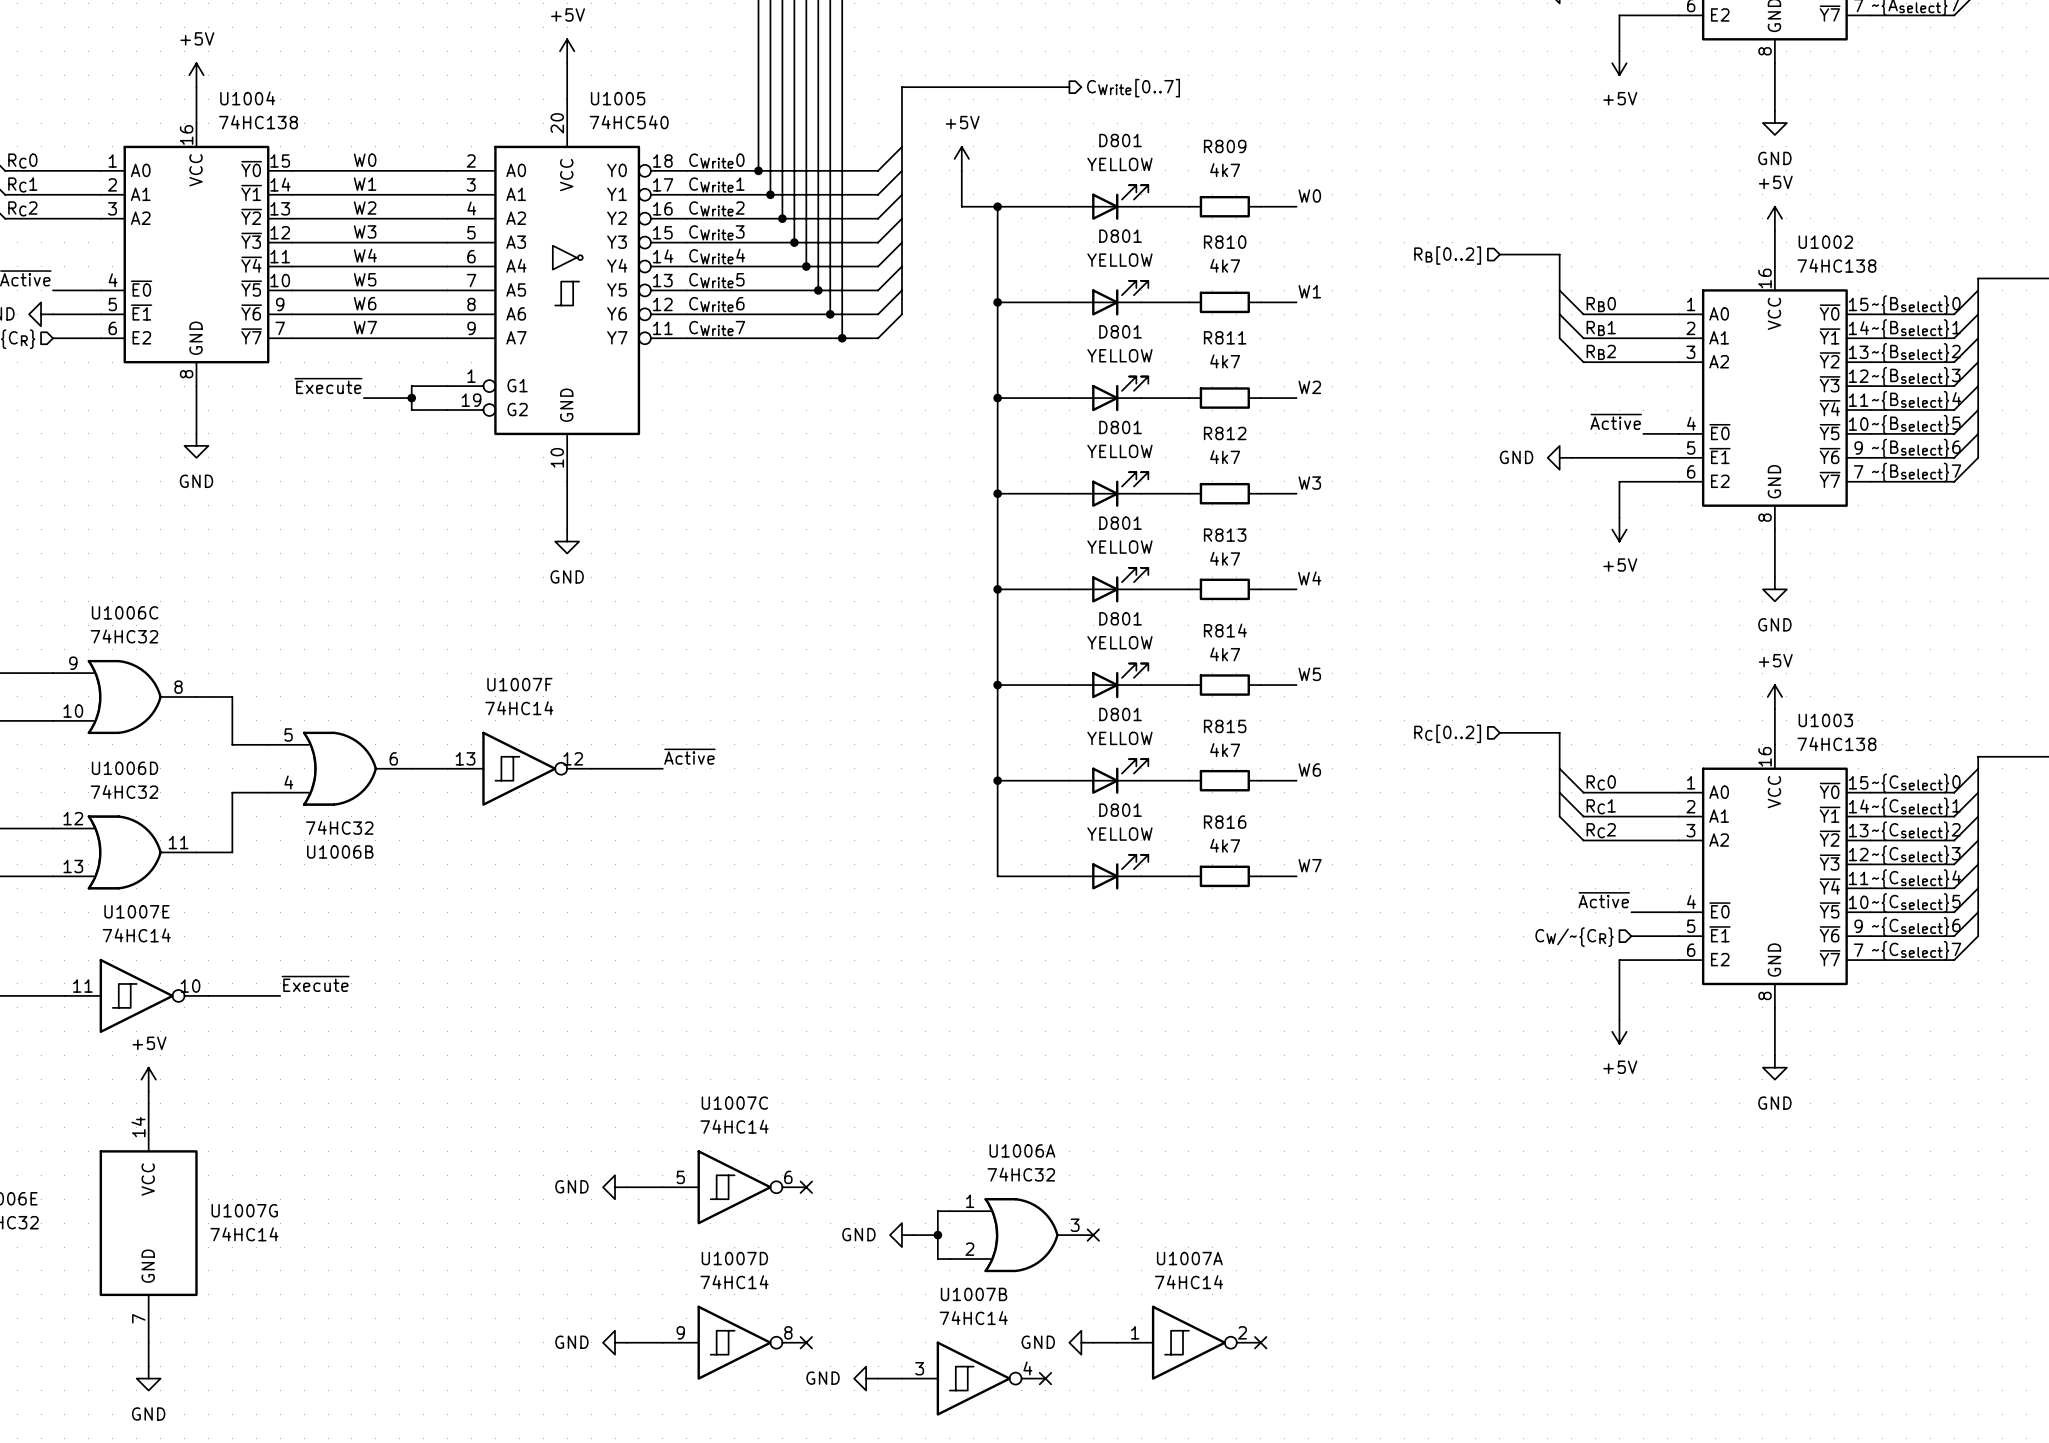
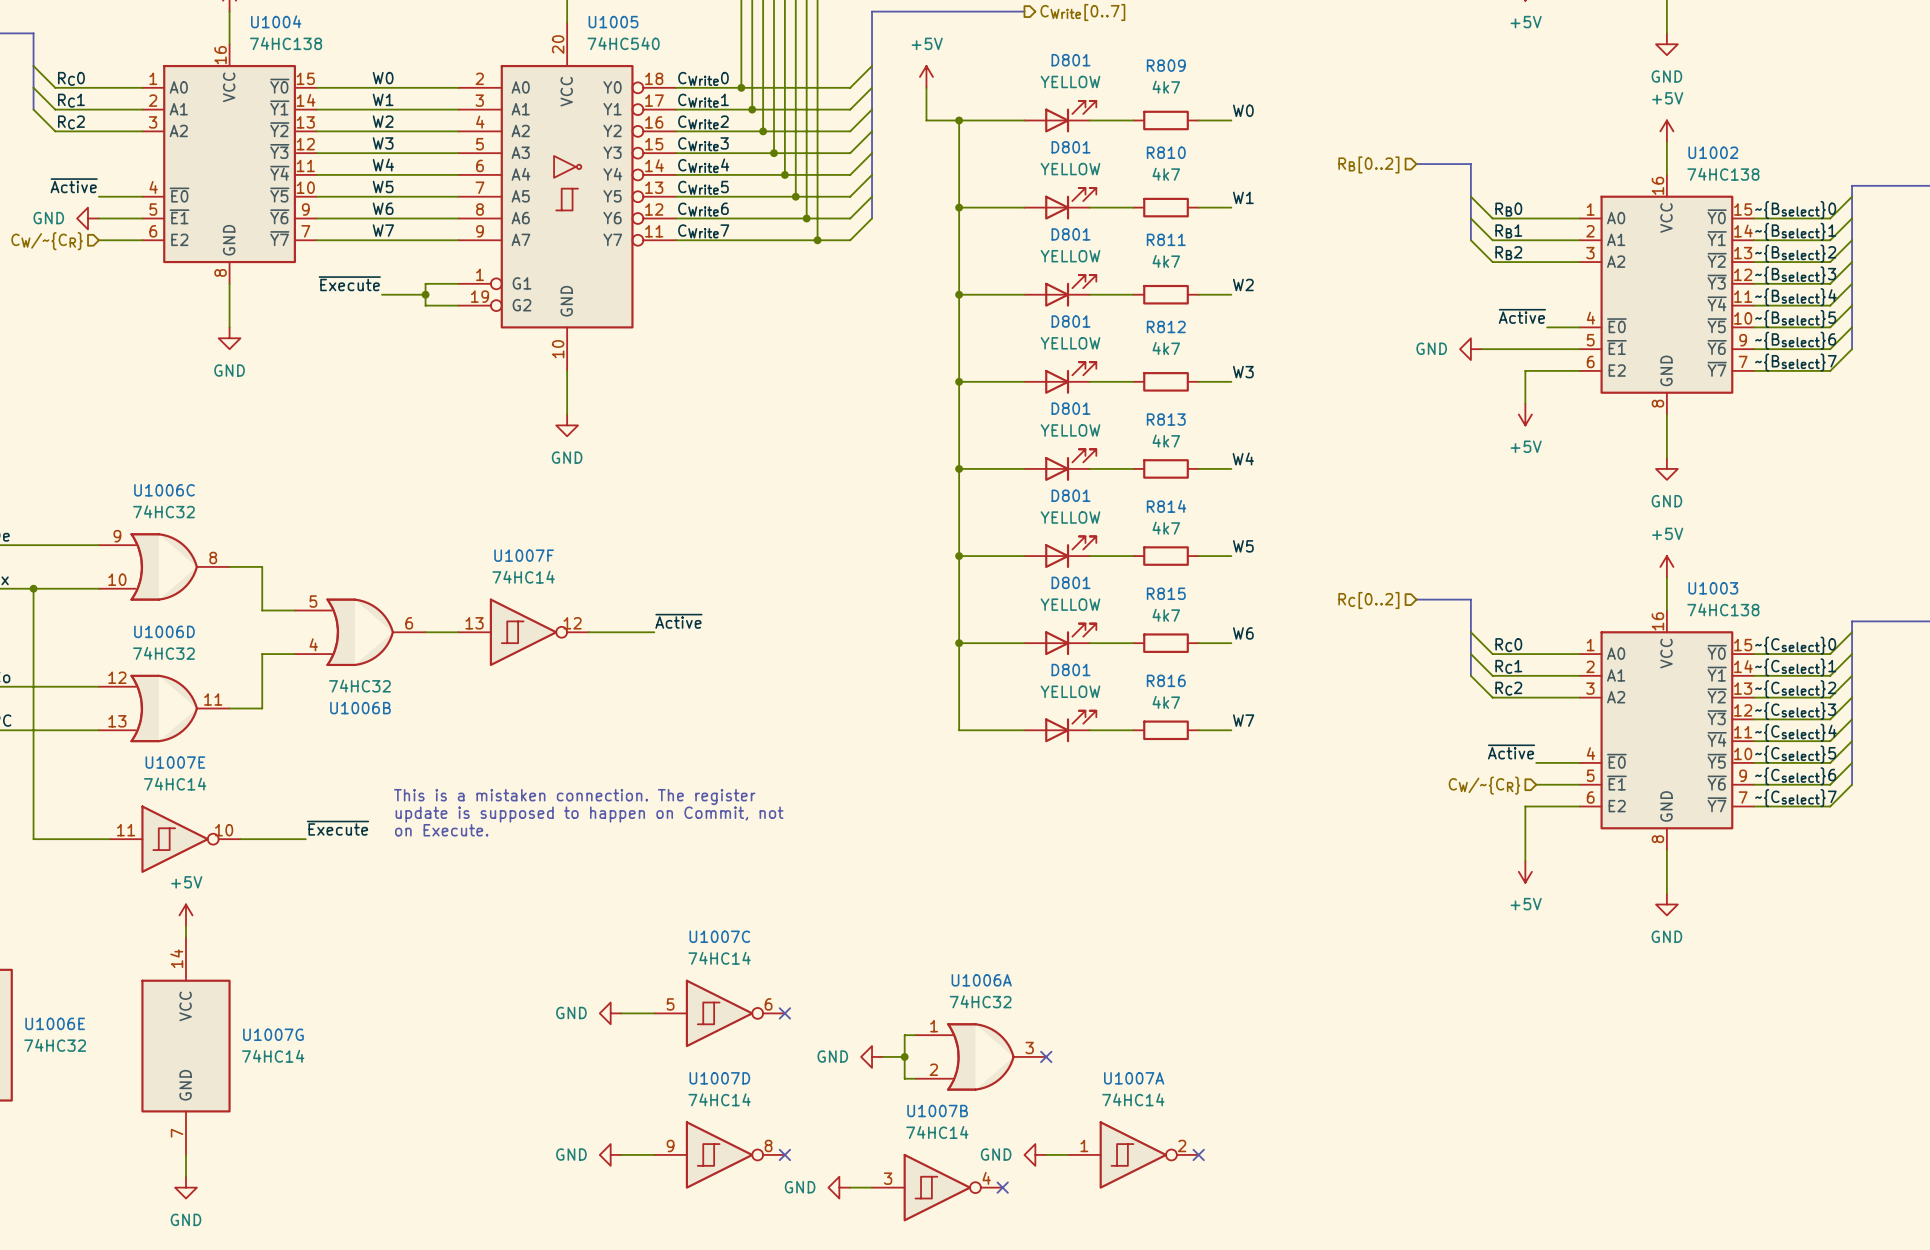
text: none -> This is a mistaken connection. The register (574, 797)
text: none -> update is supposed to happen on Commit, not (589, 814)
text: none -> on Execute. (441, 830)

